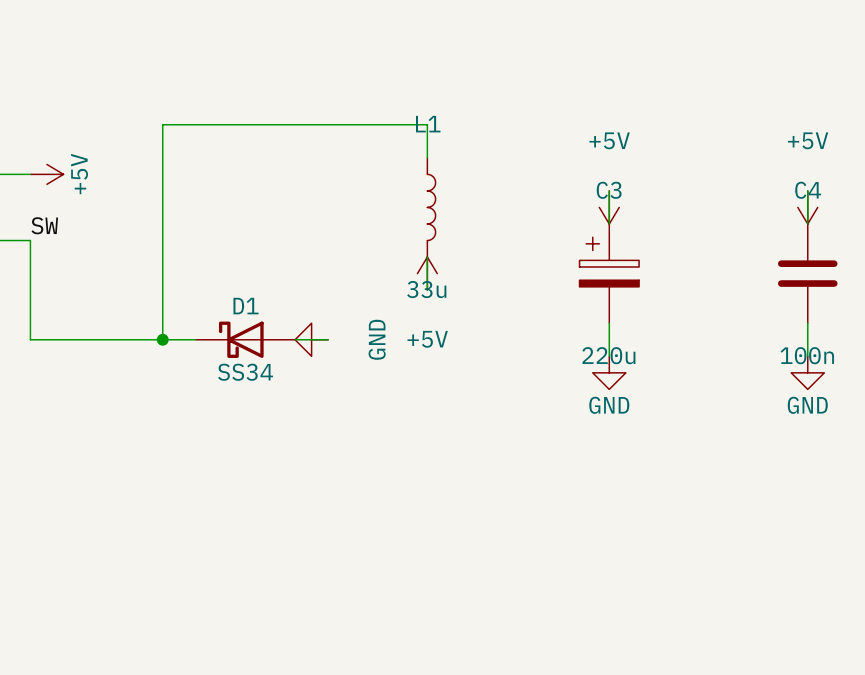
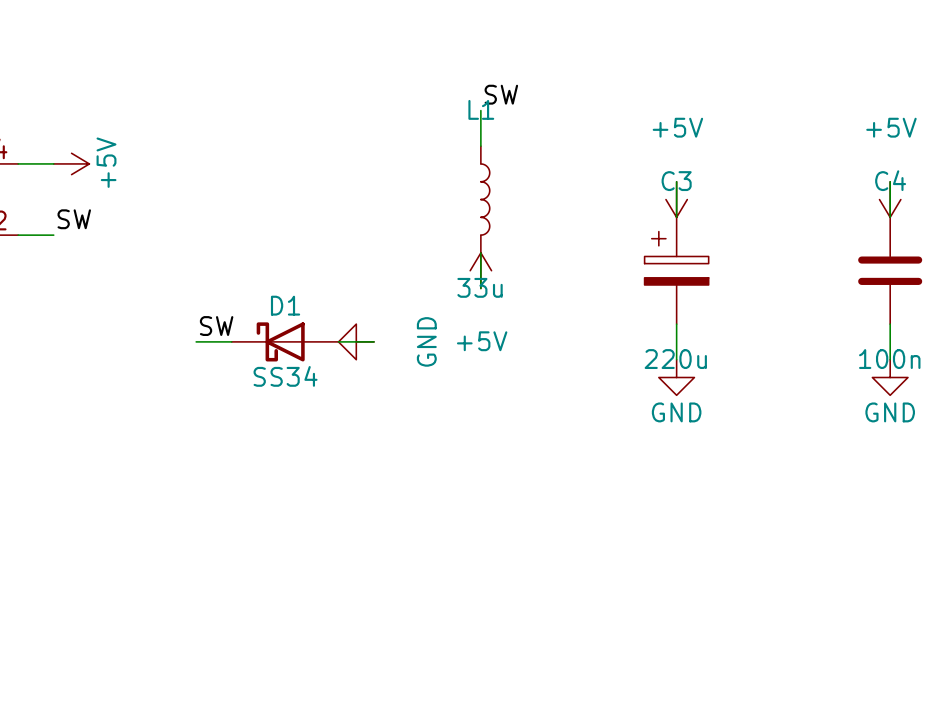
label: none -> SW (501, 94)
wire: (427, 124) (162, 124) (162, 339) (30, 339) (30, 240) -> none
label: none -> SW (216, 326)
junction: (162, 339) -> none

